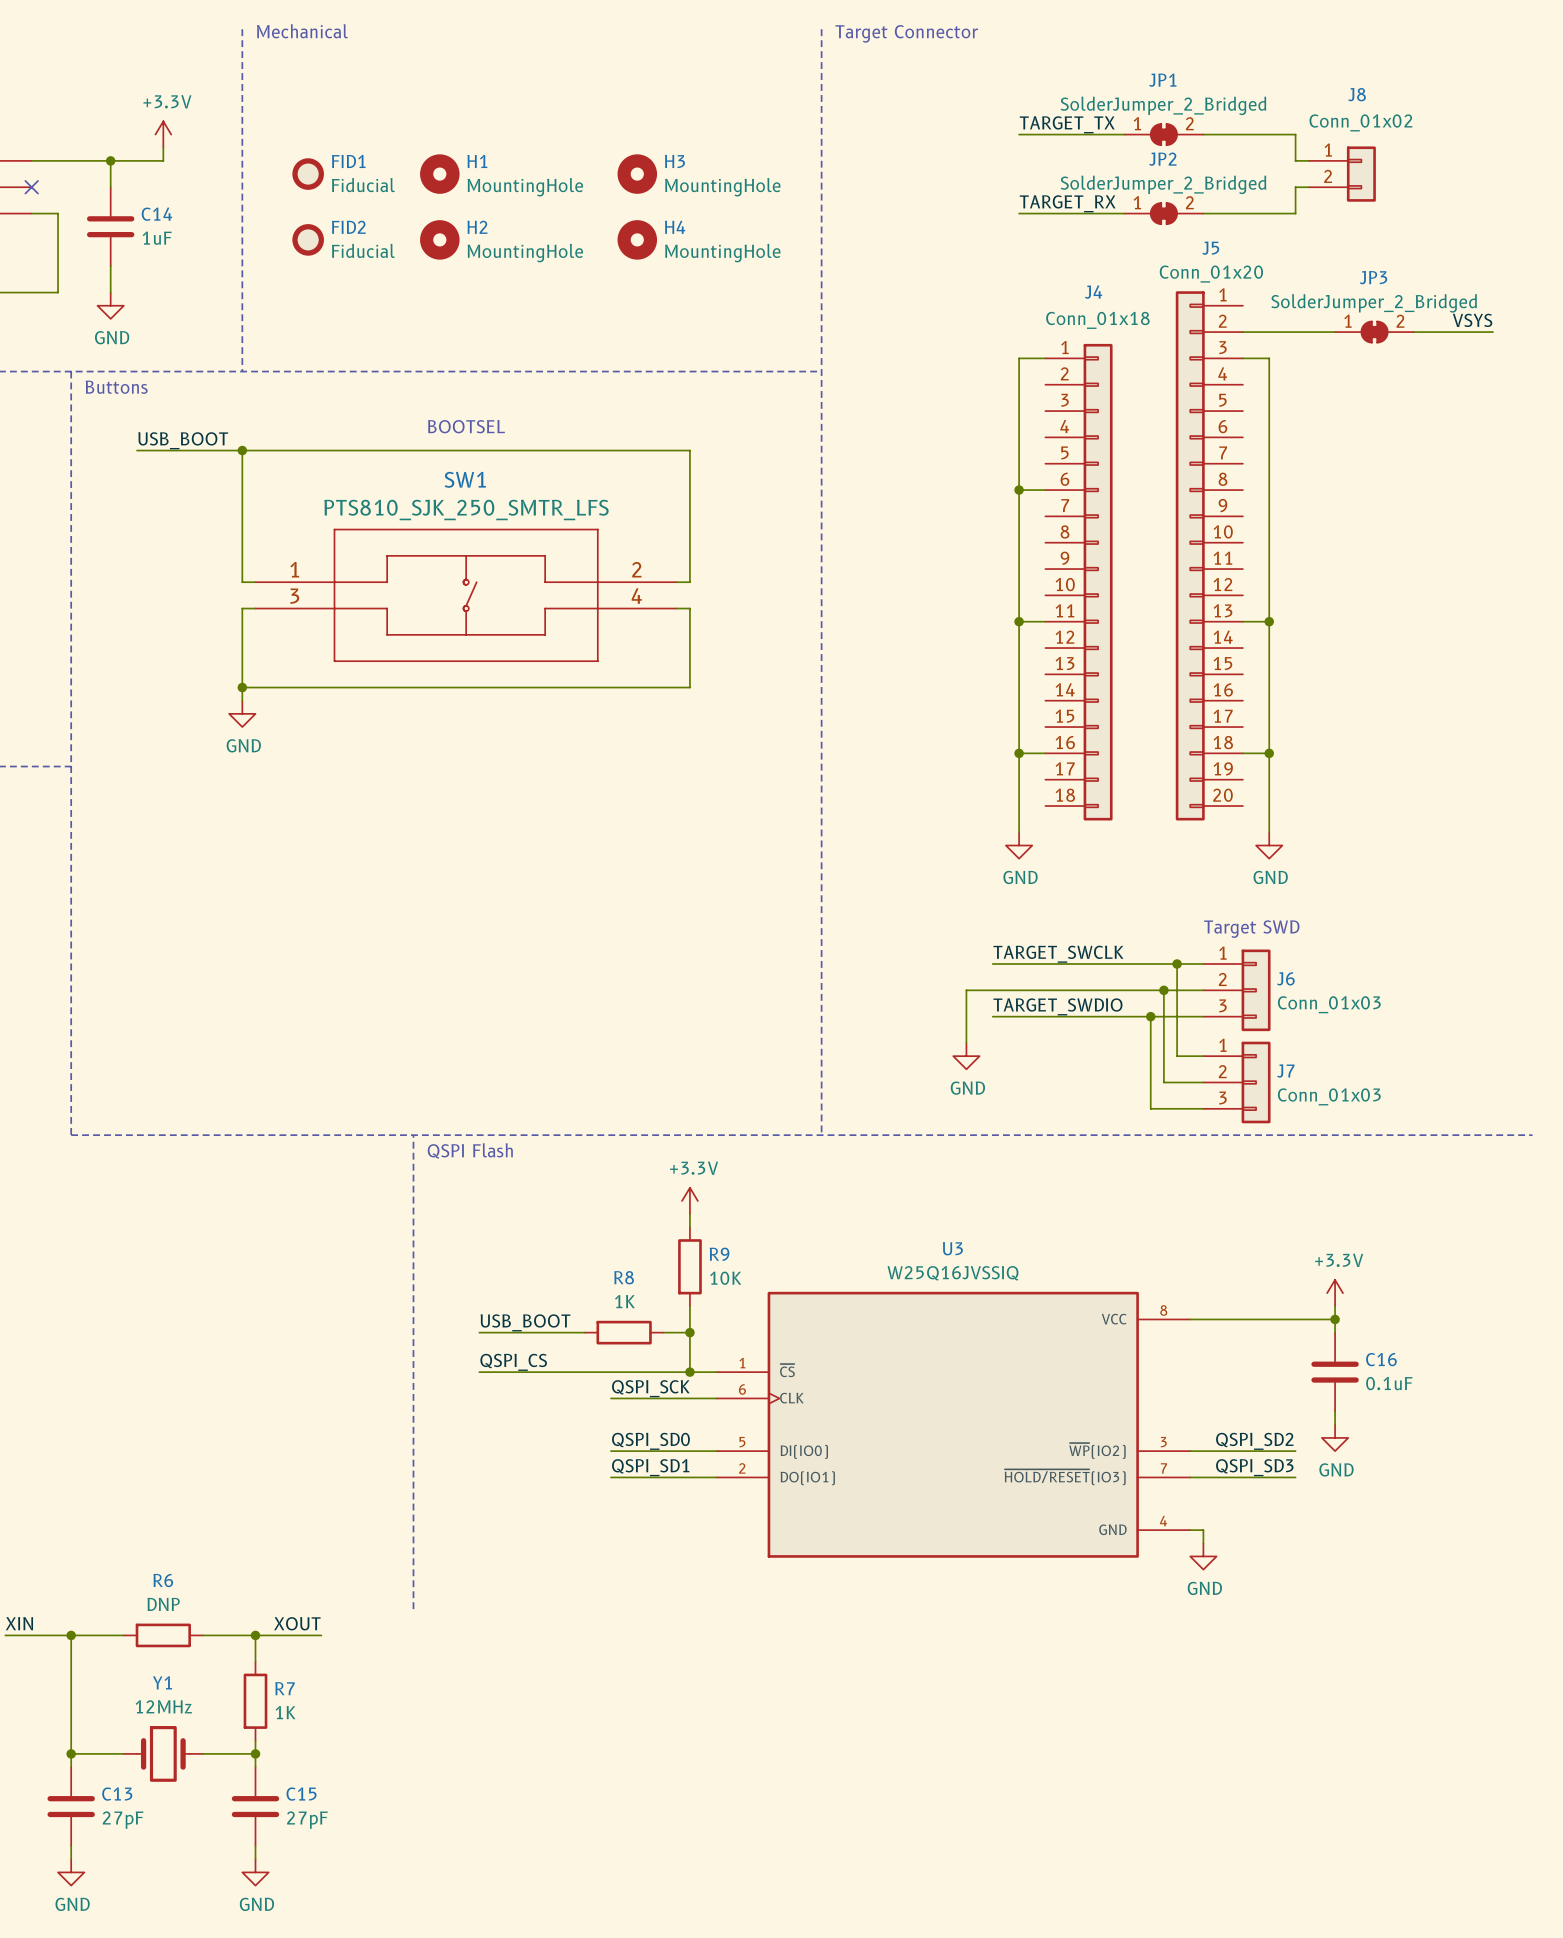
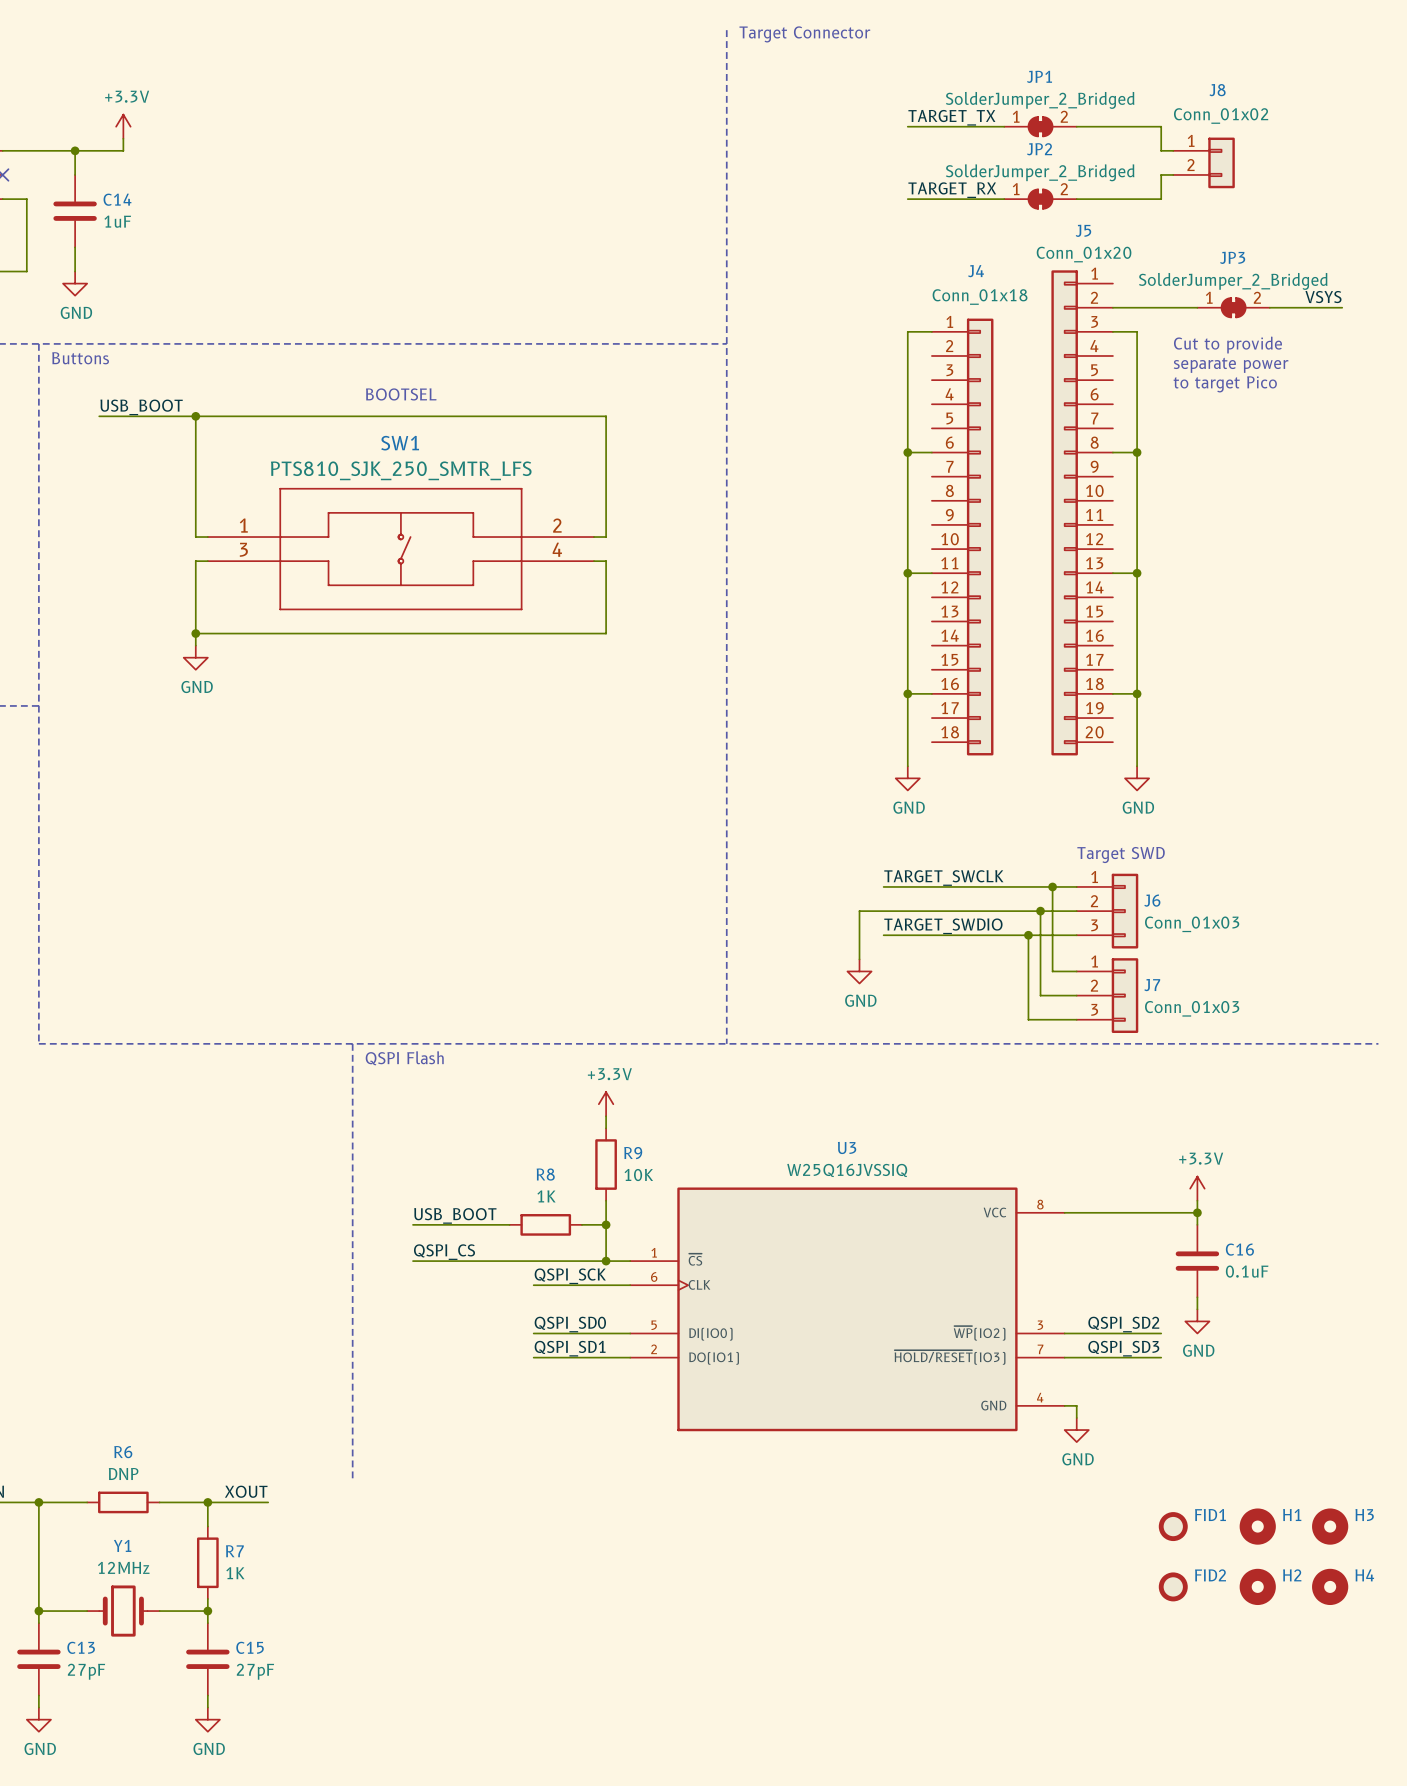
line: (242, 29) (242, 371) -> none
text: Mechanical (302, 31) -> none
FID1 position: (308, 174) -> (1173, 1526)
H1 position: (439, 174) -> (1257, 1526)
H3 position: (637, 174) -> (1330, 1526)
FID1 value: Fiducial (363, 185) -> none
H1 value: MountingHole (525, 187) -> none
H3 value: MountingHole (722, 187) -> none
FID2 position: (308, 239) -> (1173, 1586)
H2 position: (439, 239) -> (1257, 1586)
H4 position: (637, 239) -> (1330, 1586)
FID2 value: Fiducial (363, 250) -> none
H2 value: MountingHole (525, 253) -> none
H4 value: MountingHole (722, 253) -> none
text: none -> Cut to provide (1227, 345)
text: none -> separate power (1231, 365)
text: none -> to target Pico (1225, 384)
wire: none -> (1112, 452) (1137, 452)
junction: none -> (1137, 452)

